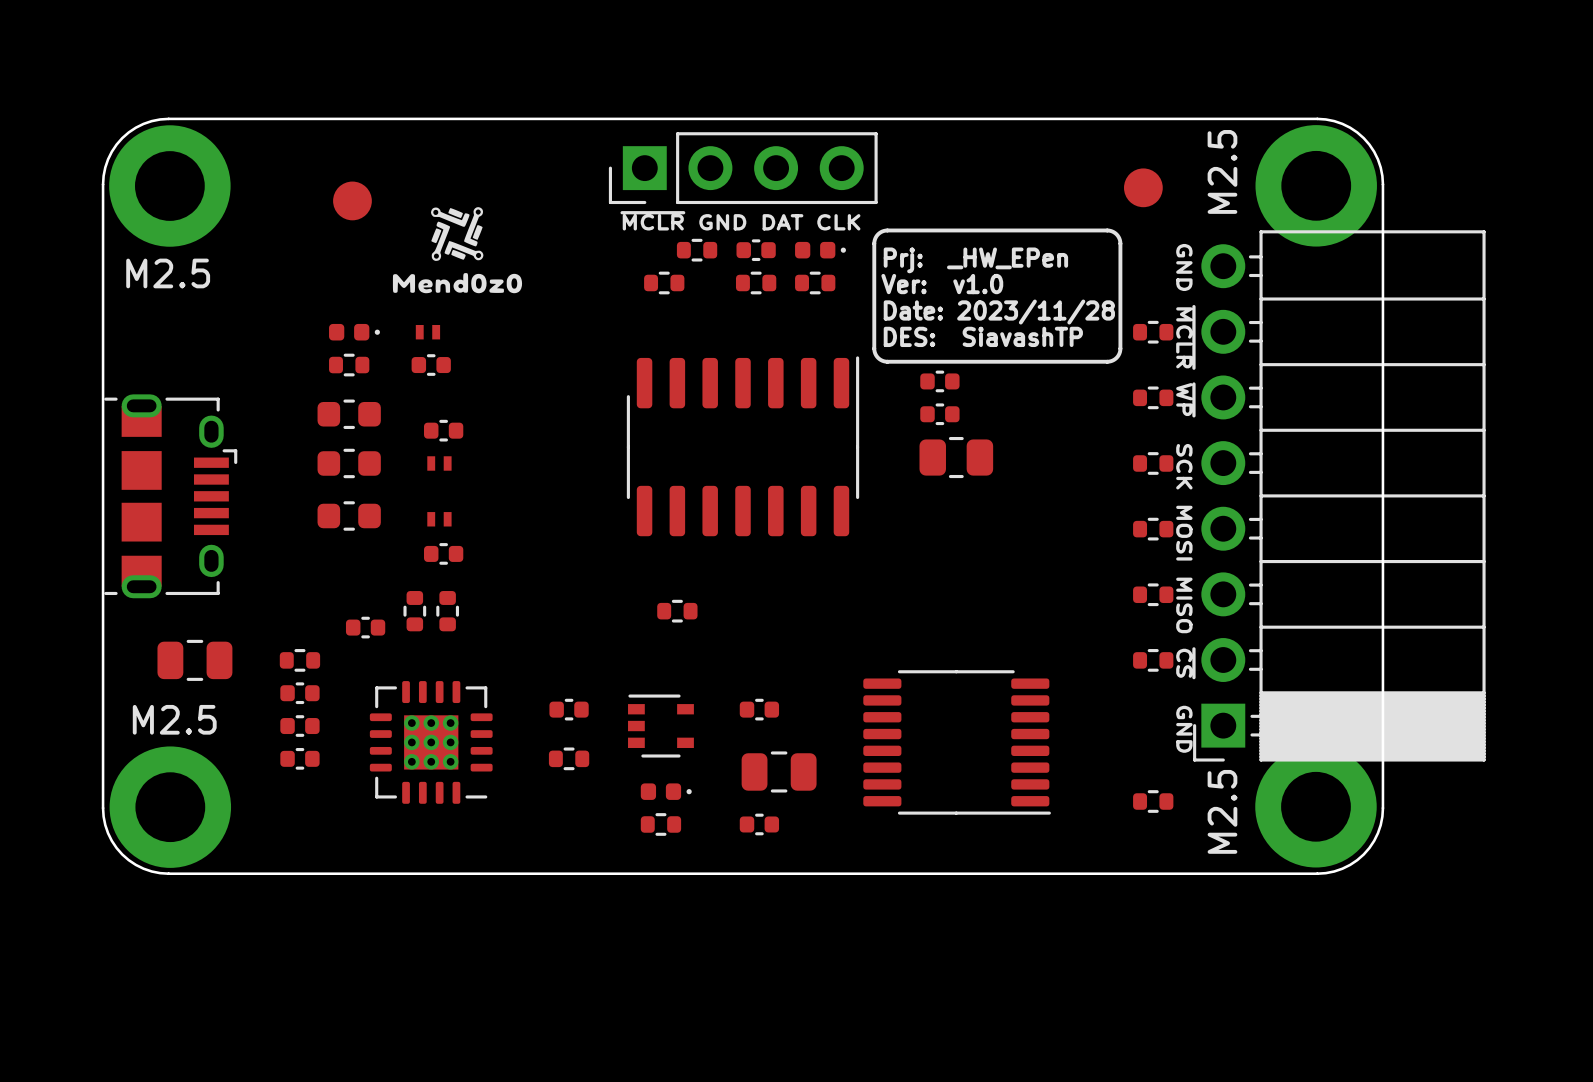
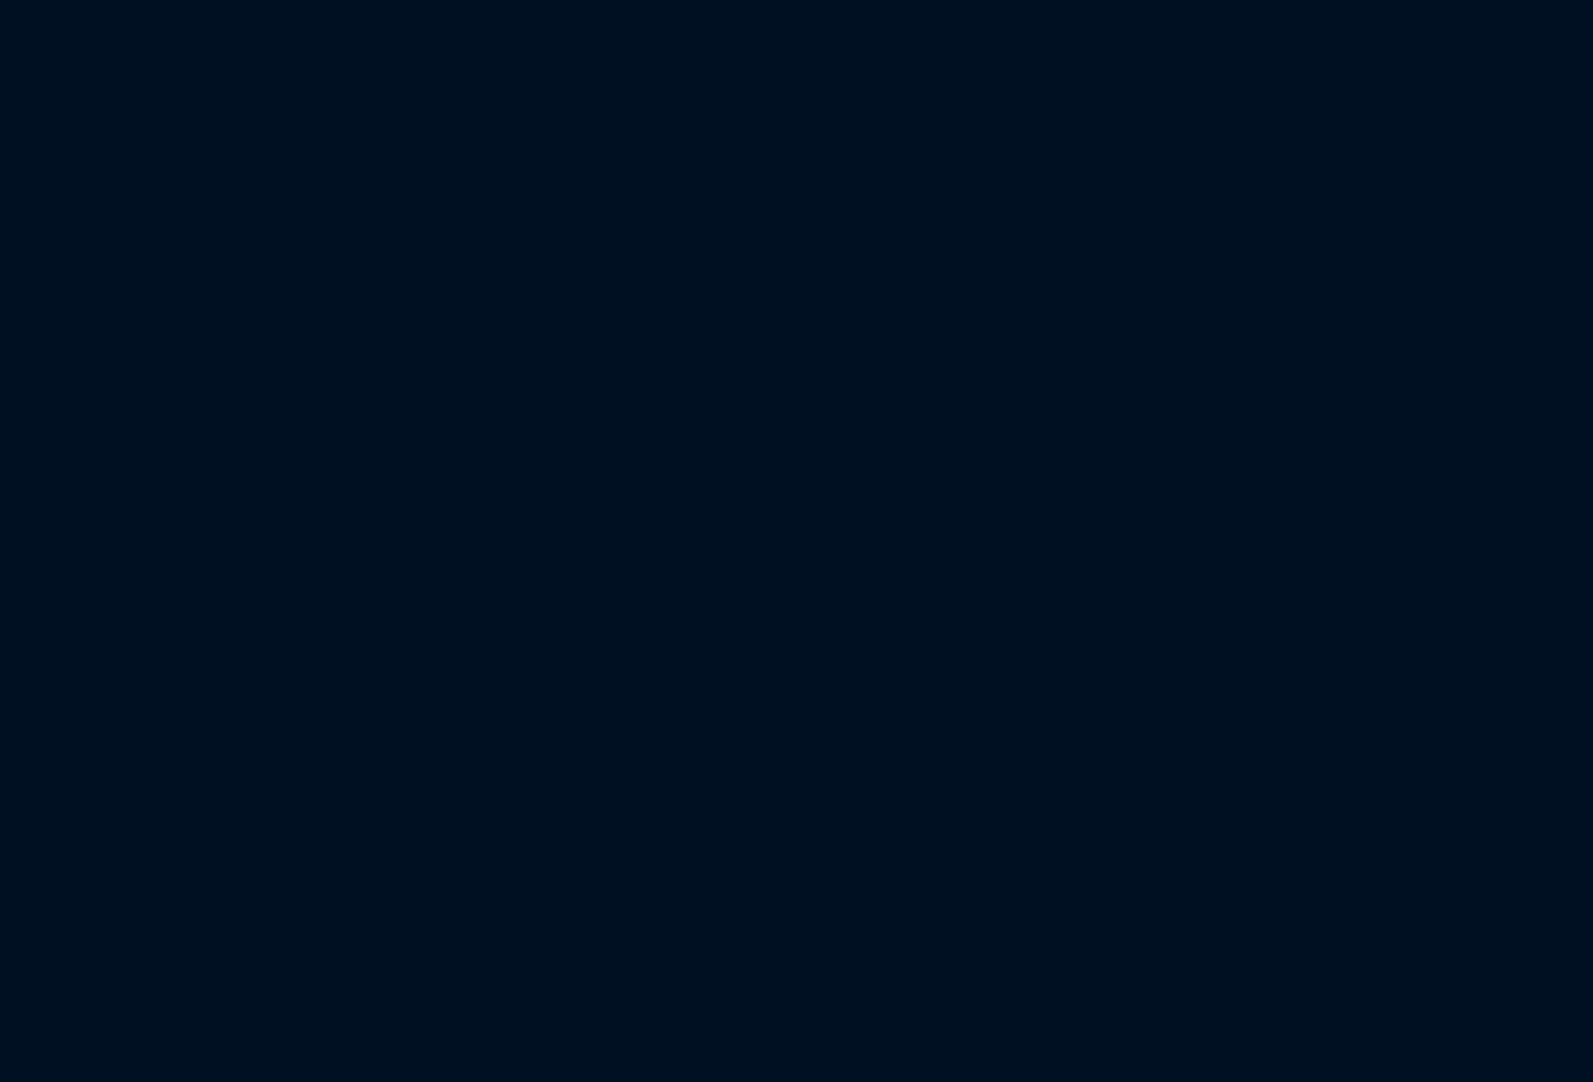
board edge: (168, 118) (1317, 118) (1334, 121) (1350, 127) (1363, 138) (1374, 151) (1380, 167) (1382, 184) (1382, 808) (1380, 825) (1374, 840) (1363, 854) (1350, 864) (1334, 871) (1317, 873) (168, 873) (151, 871) (135, 864) (122, 854) (111, 840) (105, 825) (103, 808) (103, 184) (108, 159) (122, 138) (143, 123) (168, 118) -> none
part: (743, 168) -> none
text: M2.5 (1222, 171) -> none
part: (1316, 185) -> none
part: (169, 186) -> none
part: (1143, 187) -> none
part: (352, 200) -> none
drawing: [392, 207, 523, 294] -> none
text: ~{MCLR} GND DAT CLK (740, 220) -> none
line: (887, 230) (1107, 230) (1113, 232) (1118, 237) (1120, 243) (1120, 348) (1118, 355) (1113, 359) (1107, 361) (887, 361) (880, 359) (876, 355) (874, 348) (874, 243) (878, 234) (887, 230) -> none
part: (697, 250) -> none
part: (756, 250) -> none
part: (820, 250) -> none
text: Prj: _HW_EPen (975, 260) -> none
text: M2.5 (168, 273) -> none
part: (664, 282) -> none
part: (756, 282) -> none
part: (815, 282) -> none
text: Ver: v1.0 (942, 284) -> none
text: Date: 2023/11/28 (999, 312) -> none
part: (354, 332) -> none
part: (427, 332) -> none
part: (1153, 332) -> none
text: DES: SiavashTP (983, 336) -> none
part: (349, 365) -> none
part: (431, 365) -> none
part: (939, 381) -> none
part: (1153, 397) -> none
part: (349, 414) -> none
part: (939, 414) -> none
part: (443, 430) -> none
part: (743, 446) -> none
part: (956, 457) -> none
part: (349, 463) -> none
part: (439, 463) -> none
part: (1153, 463) -> none
part: (1339, 495) -> none
part: (170, 496) -> none
text: GND ~{MCLR} ~{WP} SCK MOSI MISO ~{CS} GND (1185, 498) -> none
part: (349, 515) -> none
part: (439, 519) -> none
part: (1153, 529) -> none
part: (443, 553) -> none
part: (1153, 594) -> none
part: (414, 611) -> none
part: (447, 611) -> none
part: (677, 611) -> none
part: (365, 627) -> none
part: (194, 660) -> none
part: (299, 660) -> none
part: (1153, 660) -> none
part: (299, 693) -> none
part: (569, 709) -> none
part: (759, 709) -> none
text: M2.5 (174, 719) -> none
part: (299, 726) -> none
part: (660, 726) -> none
part: (431, 742) -> none
part: (957, 742) -> none
part: (299, 758) -> none
part: (569, 758) -> none
part: (779, 771) -> none
part: (666, 791) -> none
part: (1153, 801) -> none
part: (1315, 806) -> none
part: (170, 807) -> none
text: M2.5 (1222, 811) -> none
part: (660, 824) -> none
part: (759, 824) -> none

